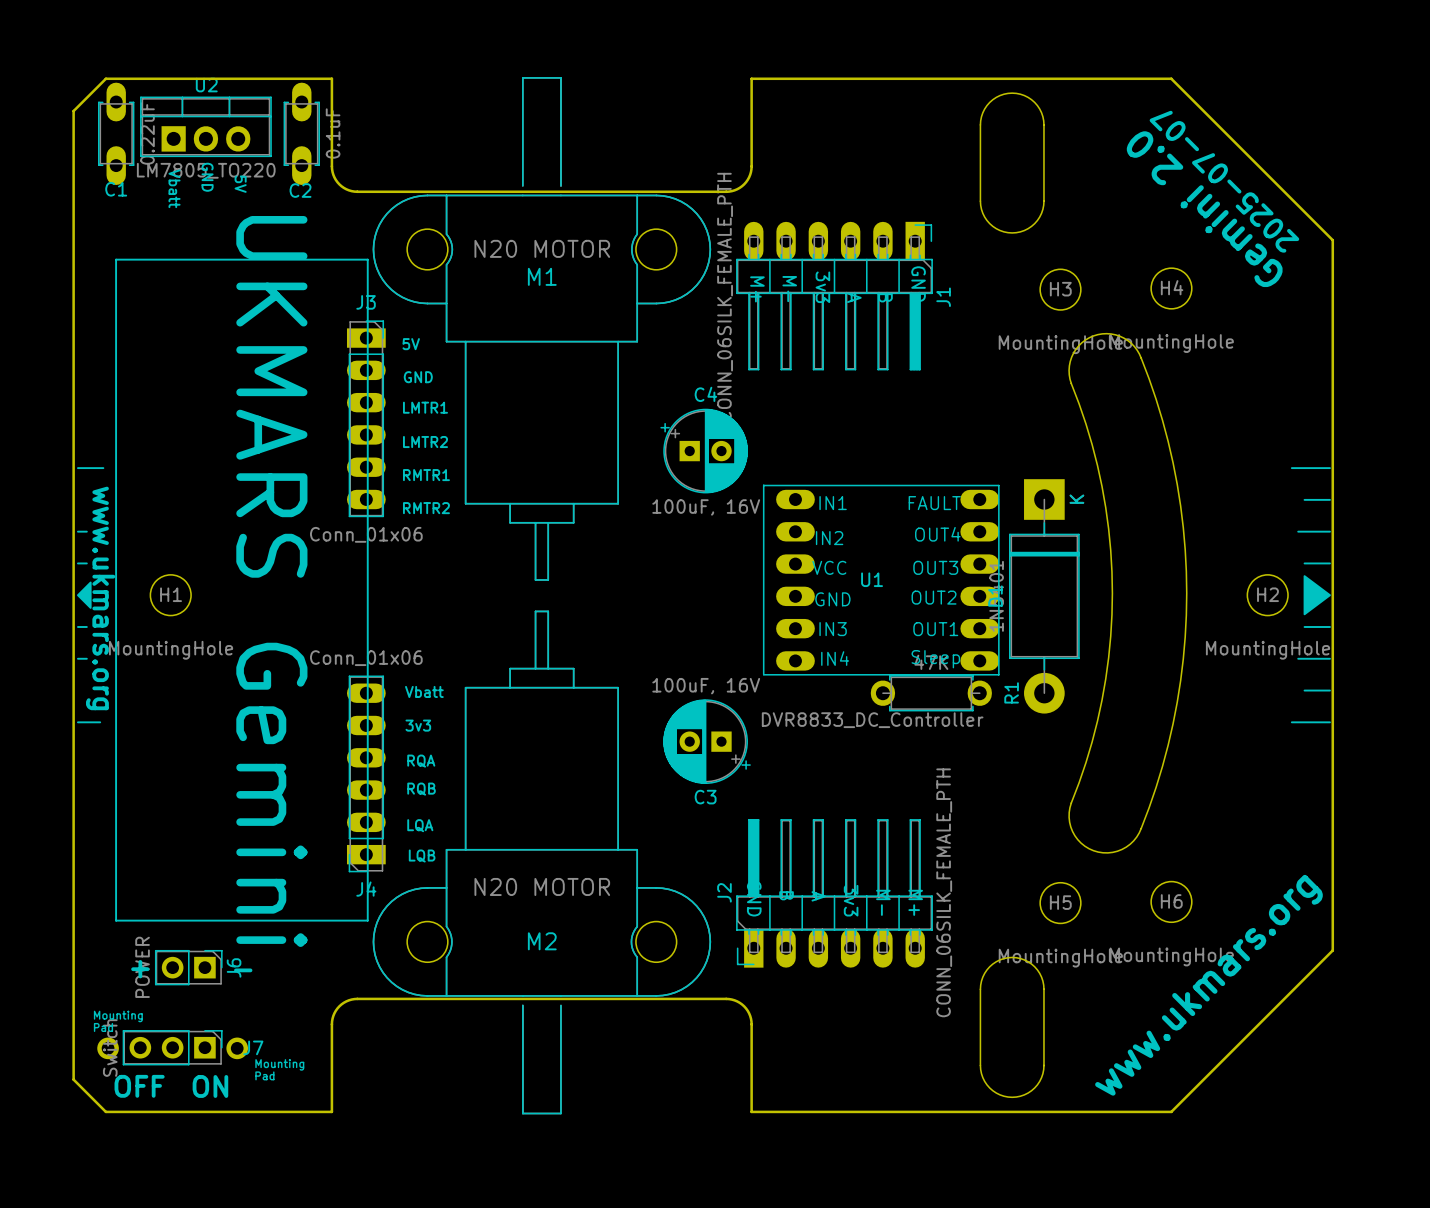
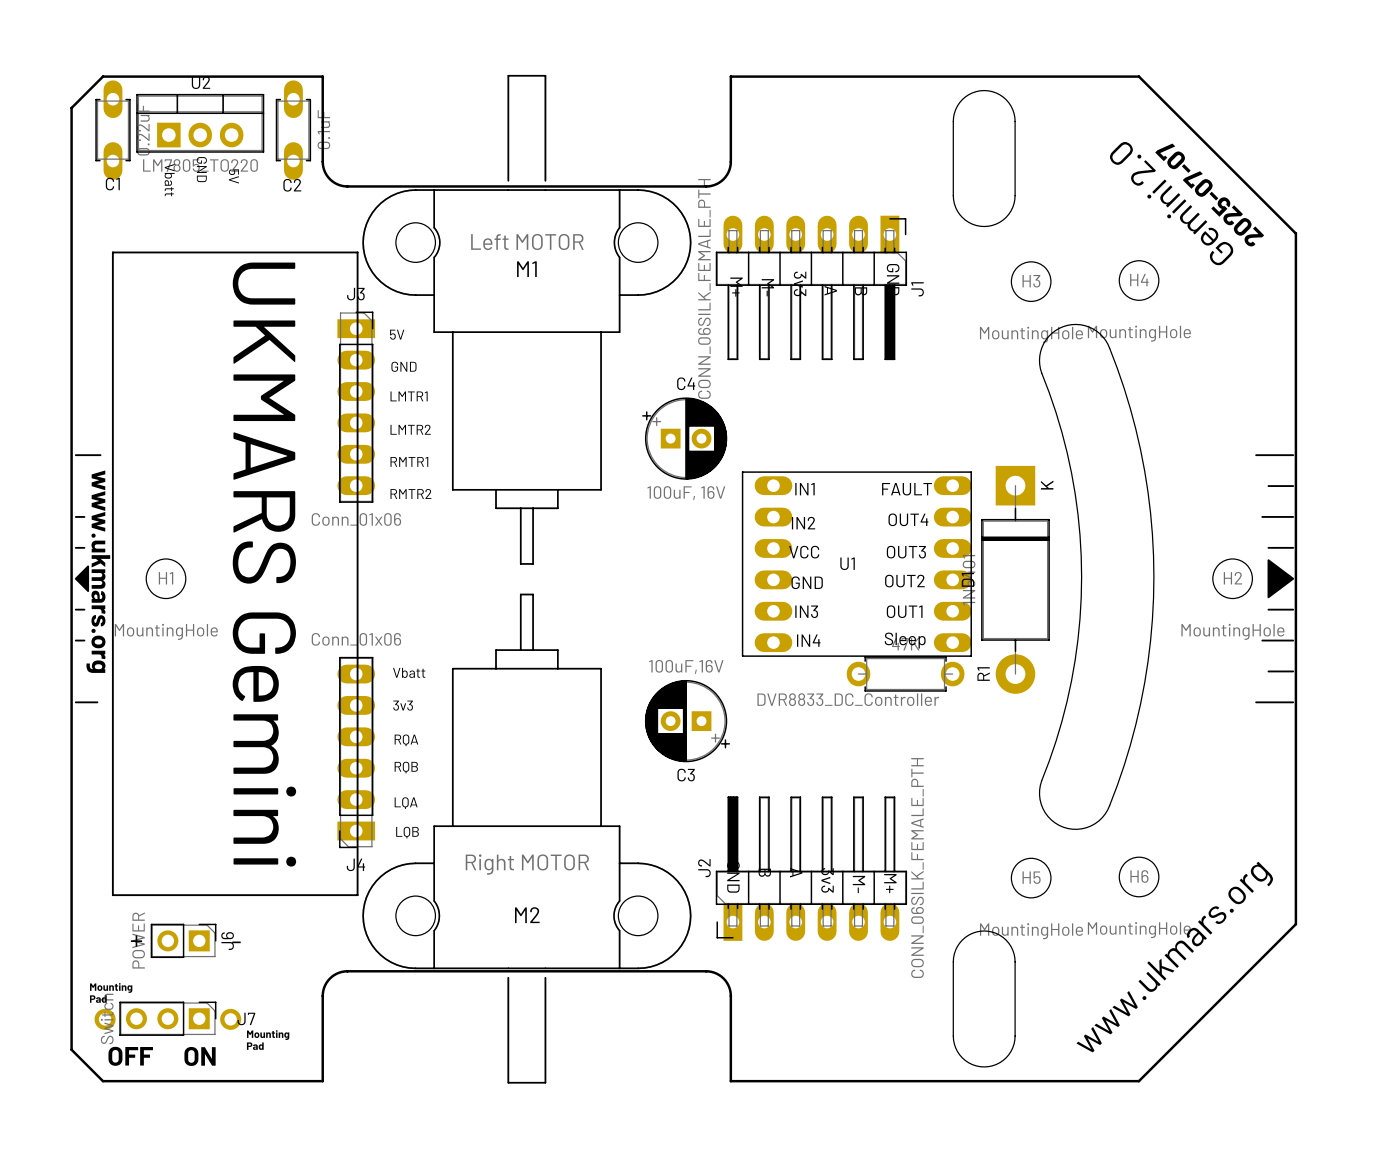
M1 value: N20 MOTOR (542, 248) -> Left MOTOR (527, 242)
C3 value: 100uF, 16V (706, 686) -> 100uF,16V (686, 666)
M2 value: N20 MOTOR (542, 886) -> Right MOTOR (527, 864)

